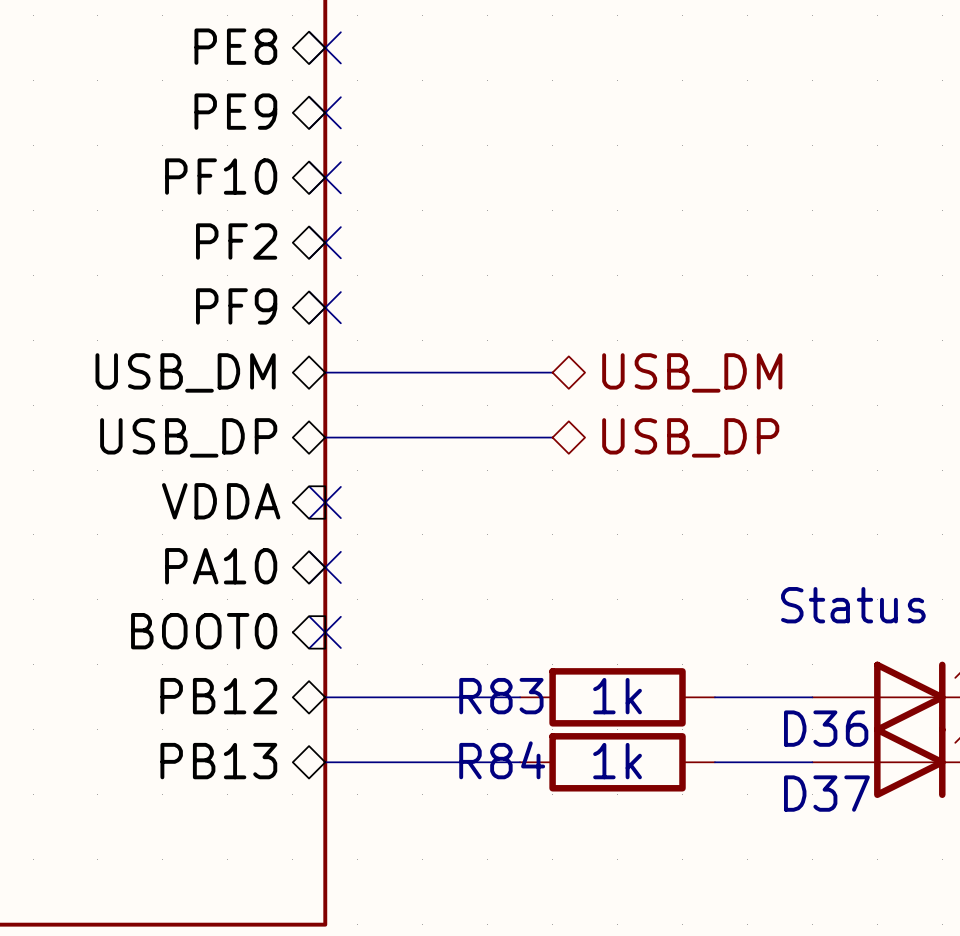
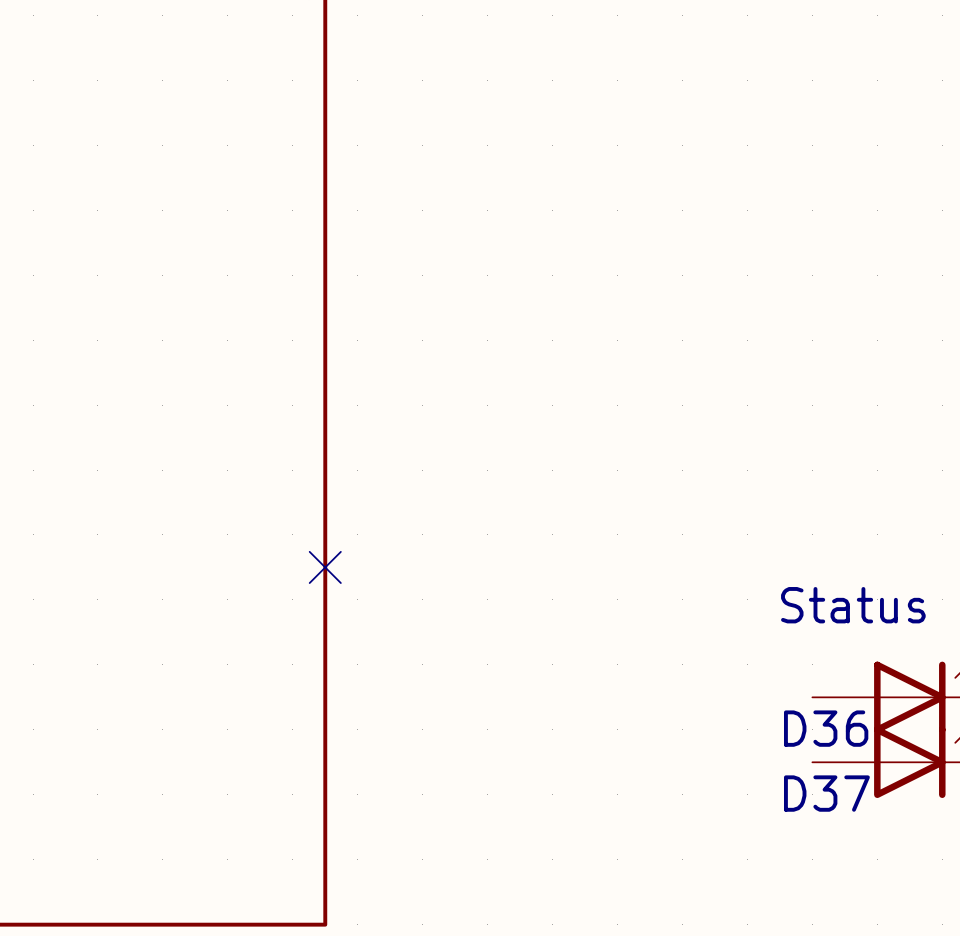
sheet pin: PE8 (235, 46) -> none
no-connect mark: (325, 47) -> none
sheet pin: PE9 (235, 111) -> none
no-connect mark: (325, 112) -> none
sheet pin: PF10 (221, 176) -> none
no-connect mark: (325, 177) -> none
sheet pin: PF2 (236, 241) -> none
no-connect mark: (325, 242) -> none
sheet pin: PF9 (236, 306) -> none
no-connect mark: (325, 307) -> none
sheet pin: USB_DM (185, 372) -> none
wire: (325, 372) (552, 372) -> none
hierarchical label: USB_DM (692, 372) -> none
sheet pin: USB_DP (188, 437) -> none
wire: (325, 437) (552, 437) -> none
hierarchical label: USB_DP (690, 437) -> none
sheet pin: VDDA (221, 501) -> none
no-connect mark: (325, 502) -> none
sheet pin: PA10 (221, 566) -> none
sheet pin: BOOT0 (204, 631) -> none
no-connect mark: (325, 632) -> none
sheet pin: PB12 (218, 696) -> none
wire: (325, 697) (520, 697) -> none
R83: 1k (617, 697) -> none
wire: (714, 697) (812, 697) -> none
sheet pin: PB13 (218, 761) -> none
wire: (325, 762) (520, 762) -> none
R84: 1k (617, 762) -> none
wire: (714, 762) (812, 762) -> none

